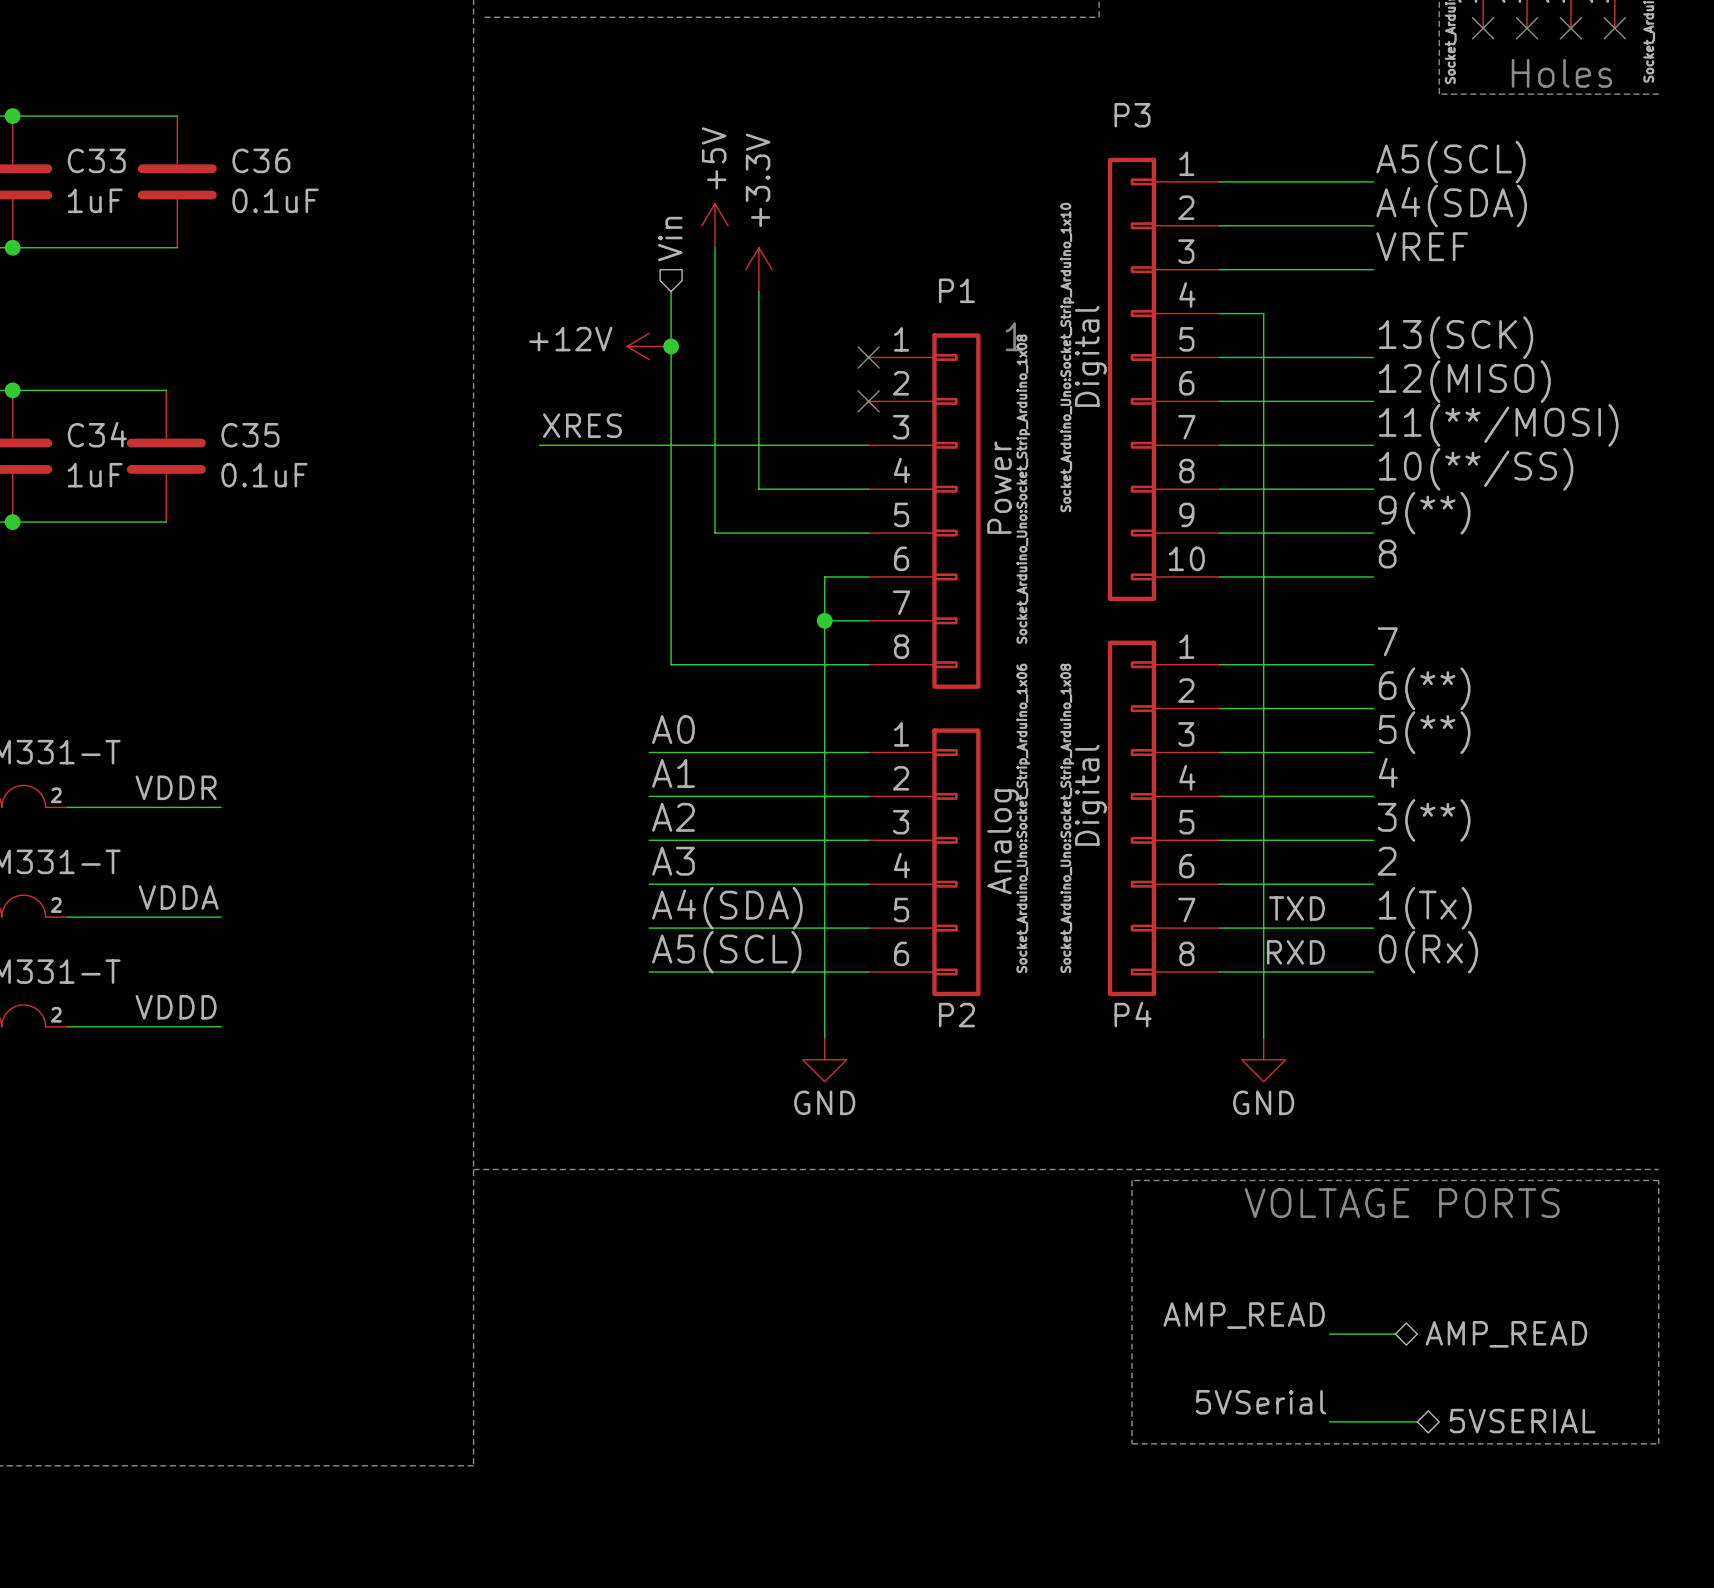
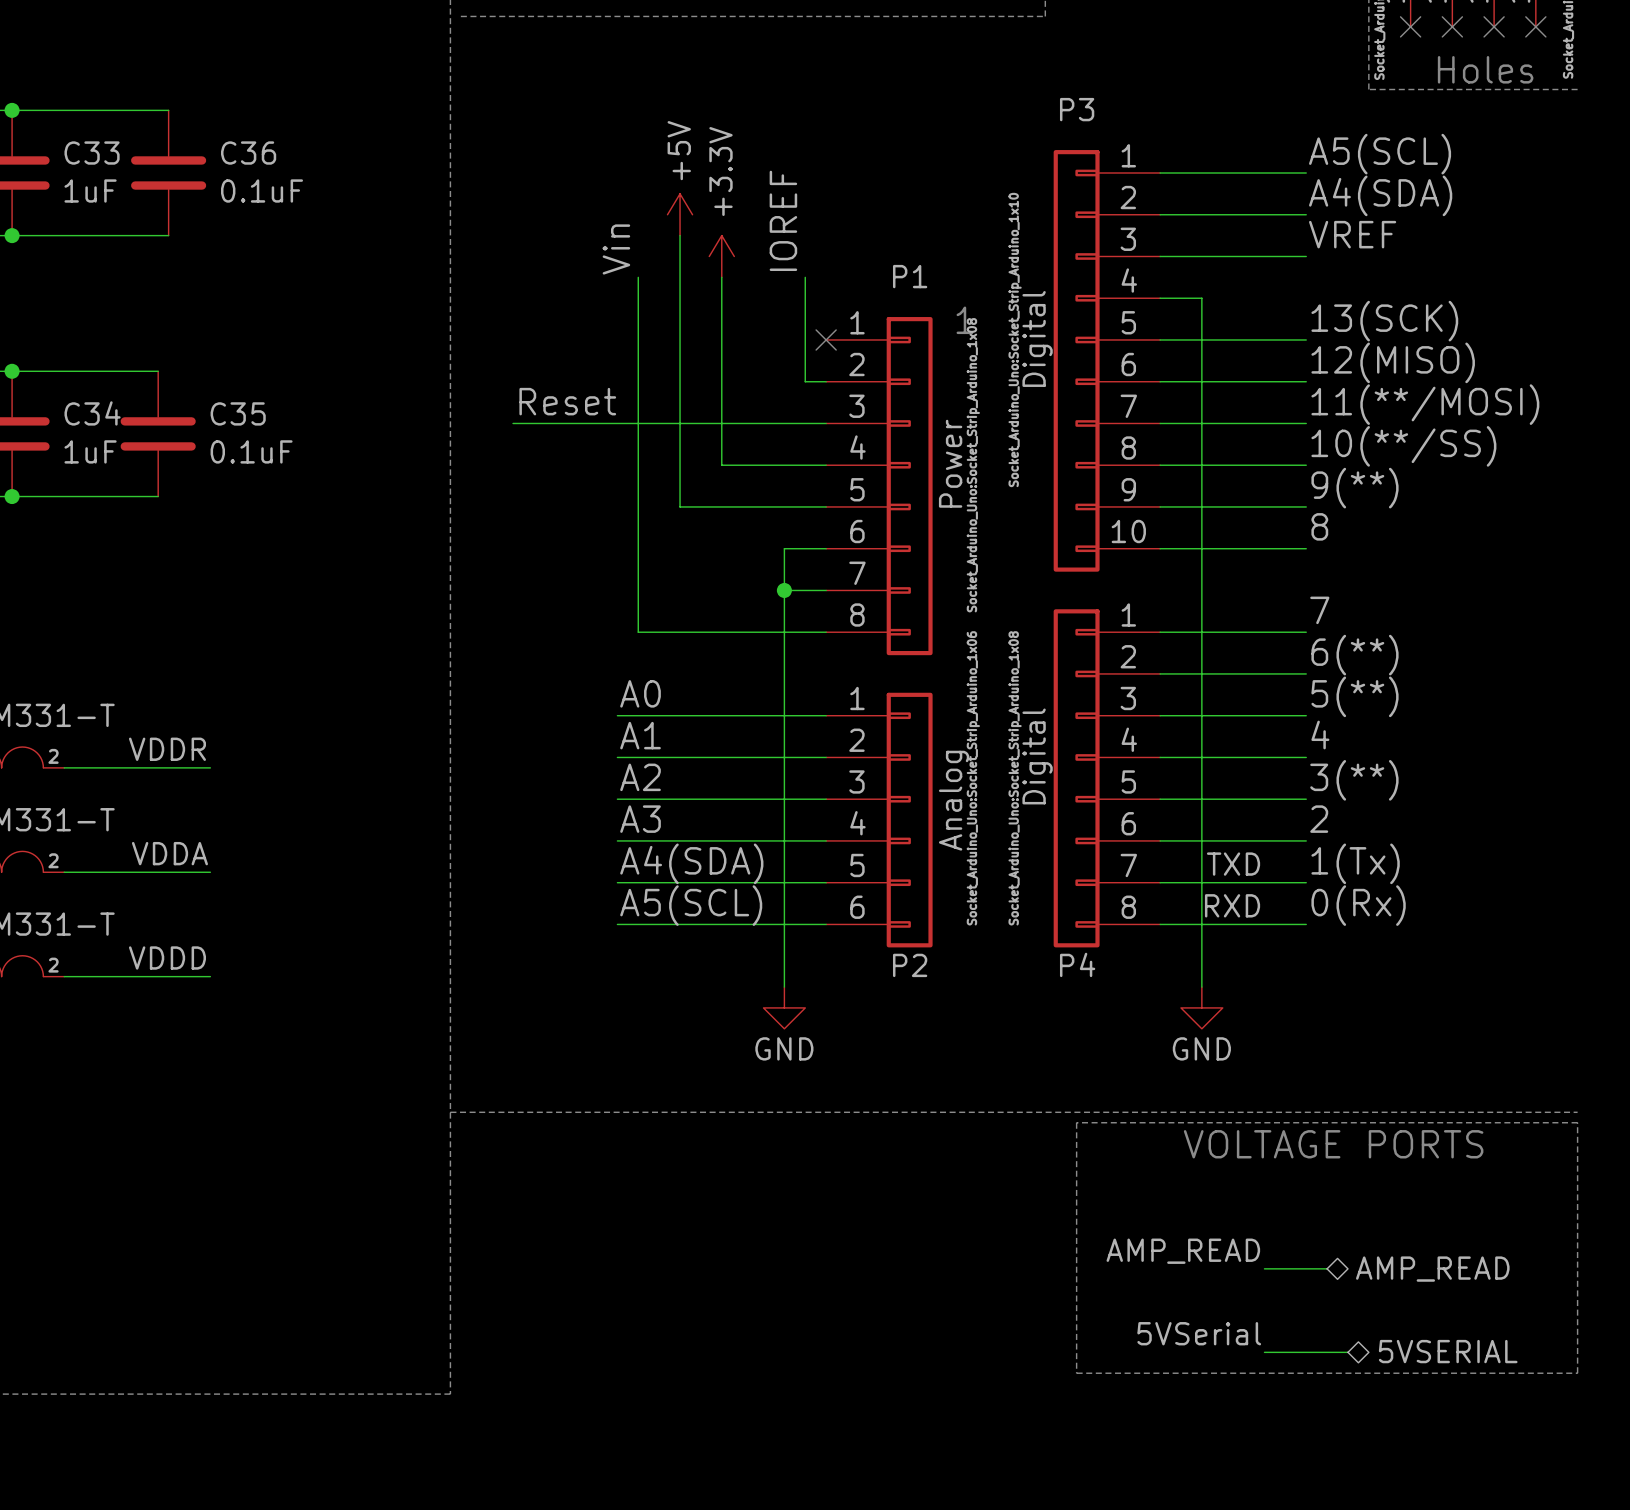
label: none -> IOREF (783, 220)
hierarchical label: Vin (670, 239) -> none
label: none -> Vin (616, 249)
wire: none -> (805, 277) (805, 381) (826, 381)
power symbol: +12V (649, 346) -> none
junction: (671, 346) -> none
no-connect mark: (868, 401) -> none
label: XRES (582, 425) -> Reset (567, 401)

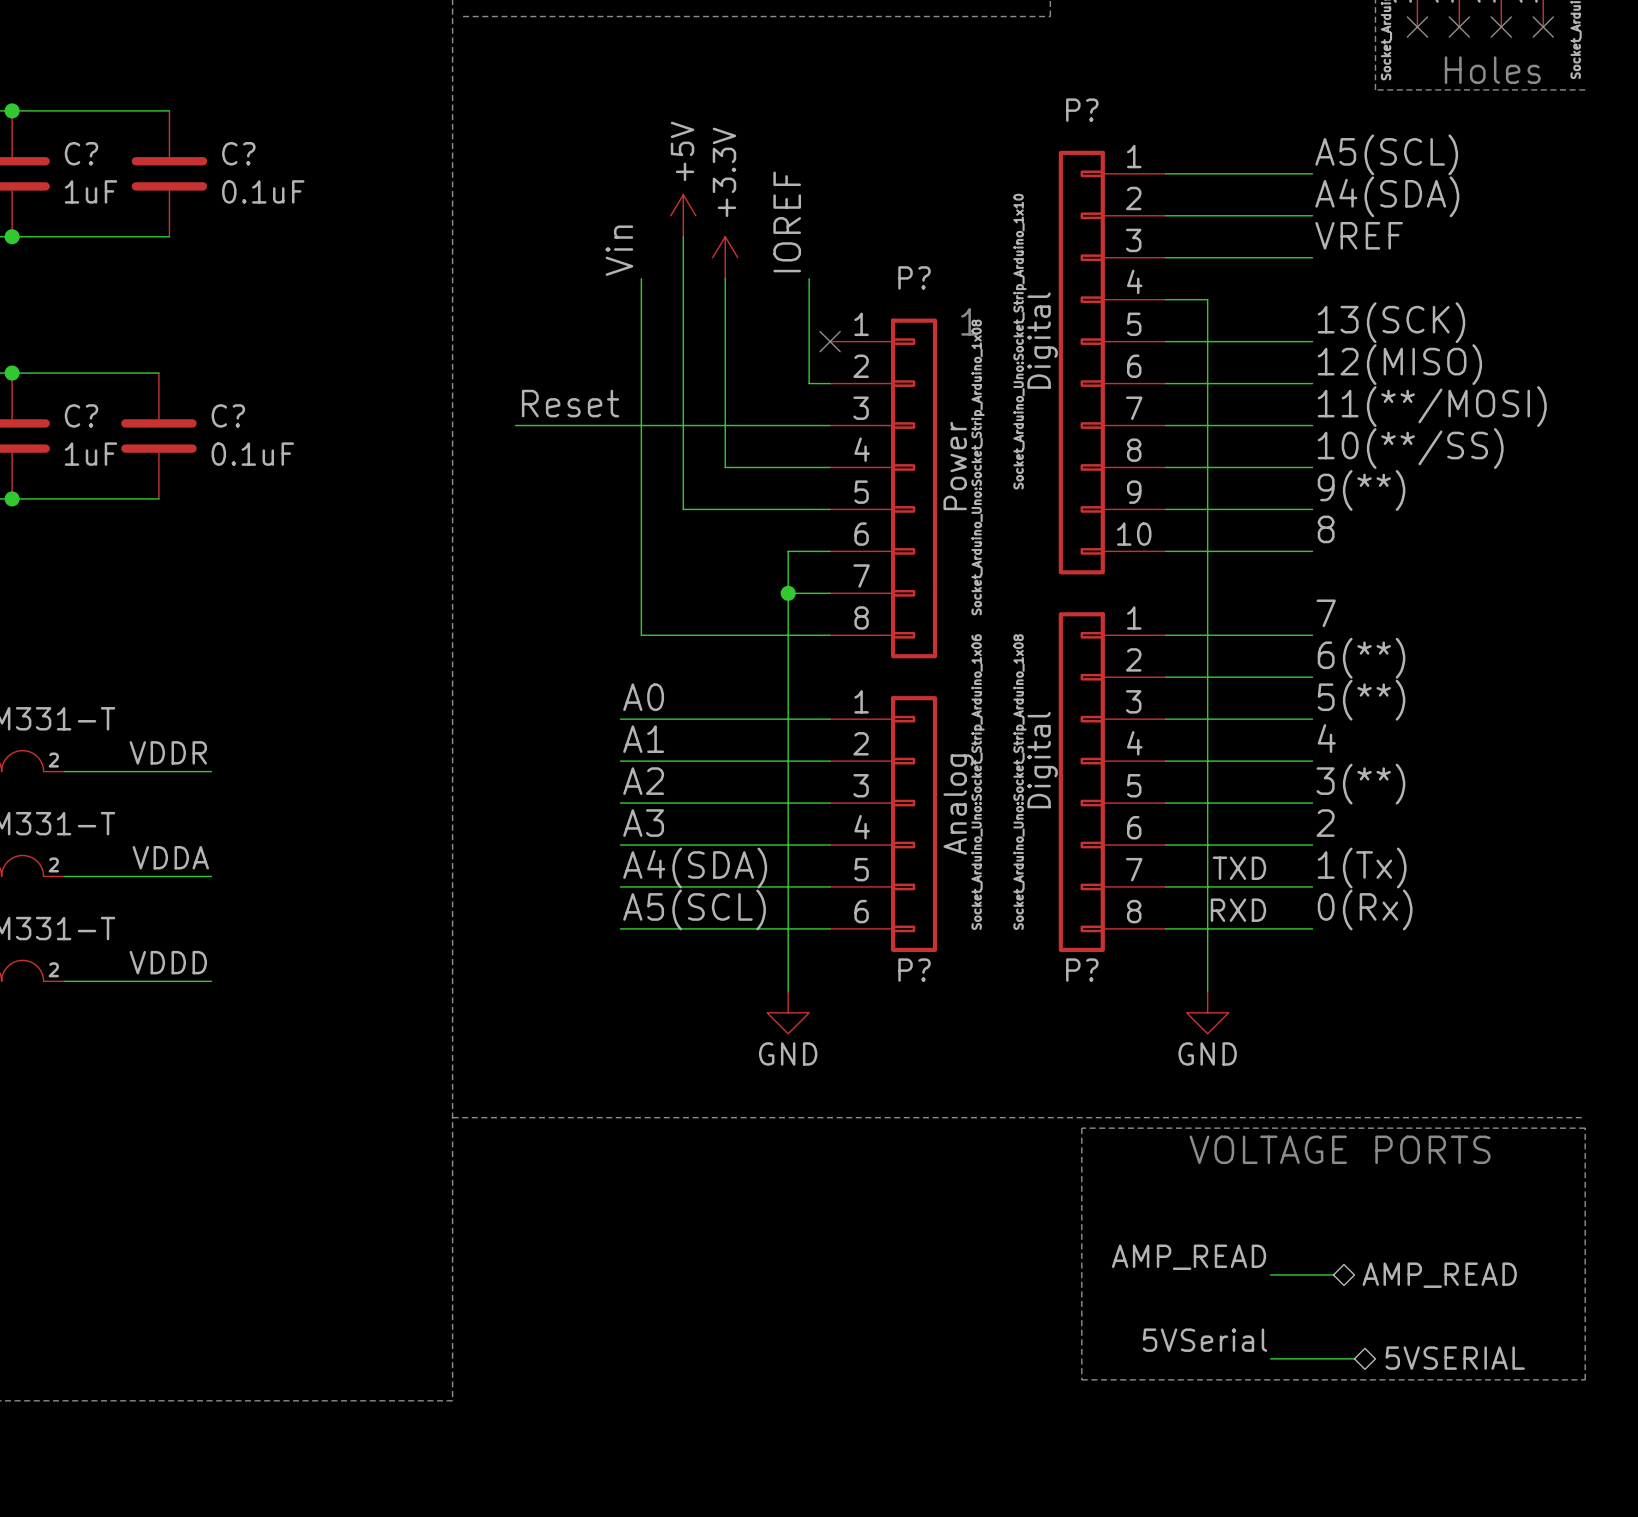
P3 name: P3 (1077, 109) -> P? (1082, 110)
C33 name: C33 (92, 153) -> C? (81, 153)
C36 name: C36 (248, 153) -> C? (238, 153)
P1 name: P1 (910, 276) -> P? (914, 277)
C34 name: C34 (92, 413) -> C? (81, 415)
C35 name: C35 (238, 413) -> C? (228, 415)
P4 name: P4 (1077, 964) -> P? (1082, 970)
P2 name: P2 (910, 965) -> P? (914, 970)

